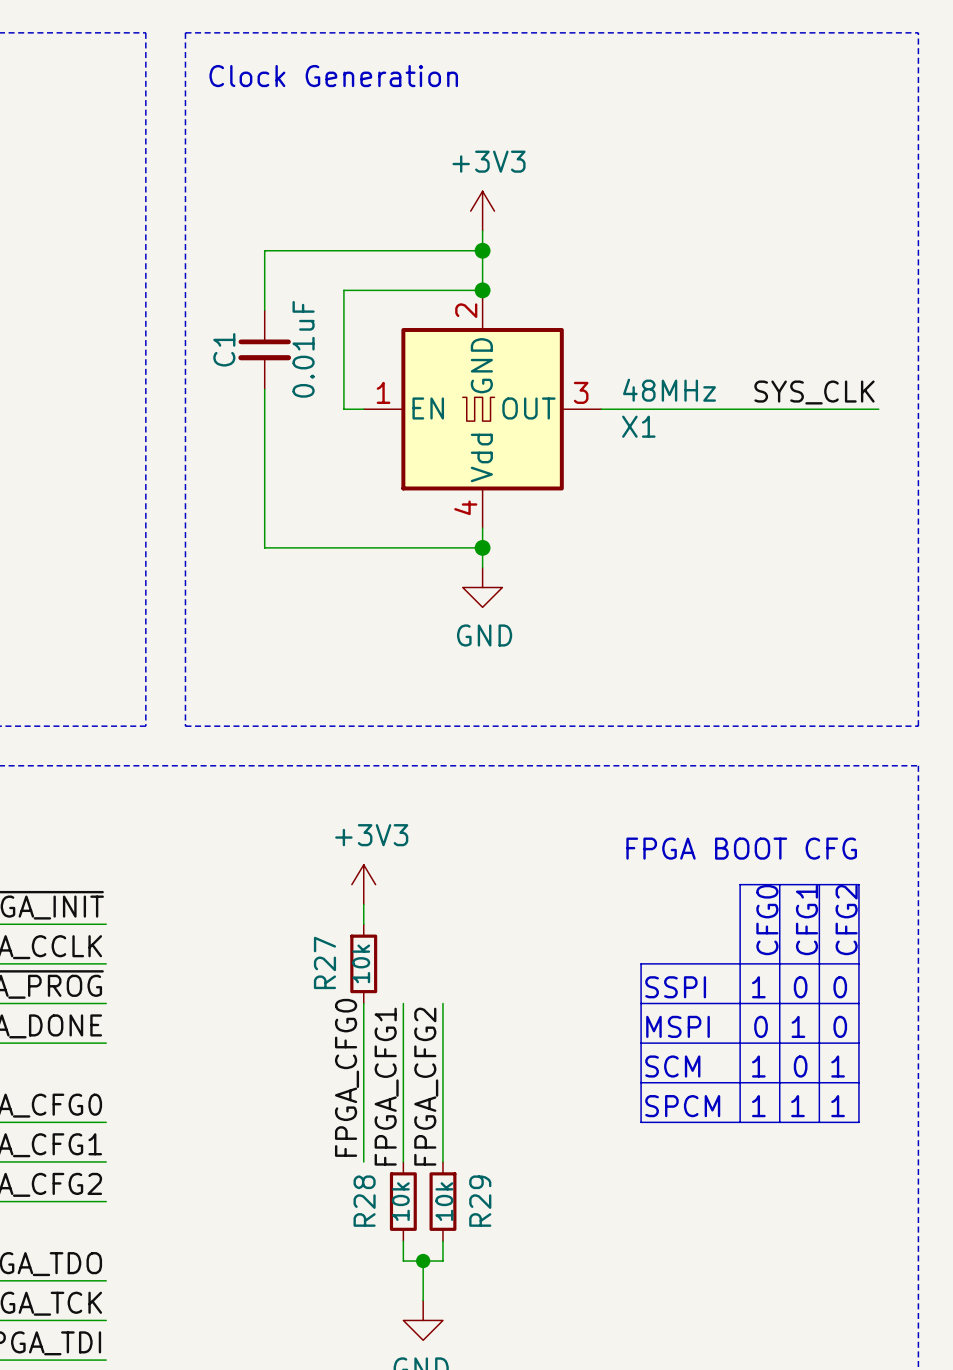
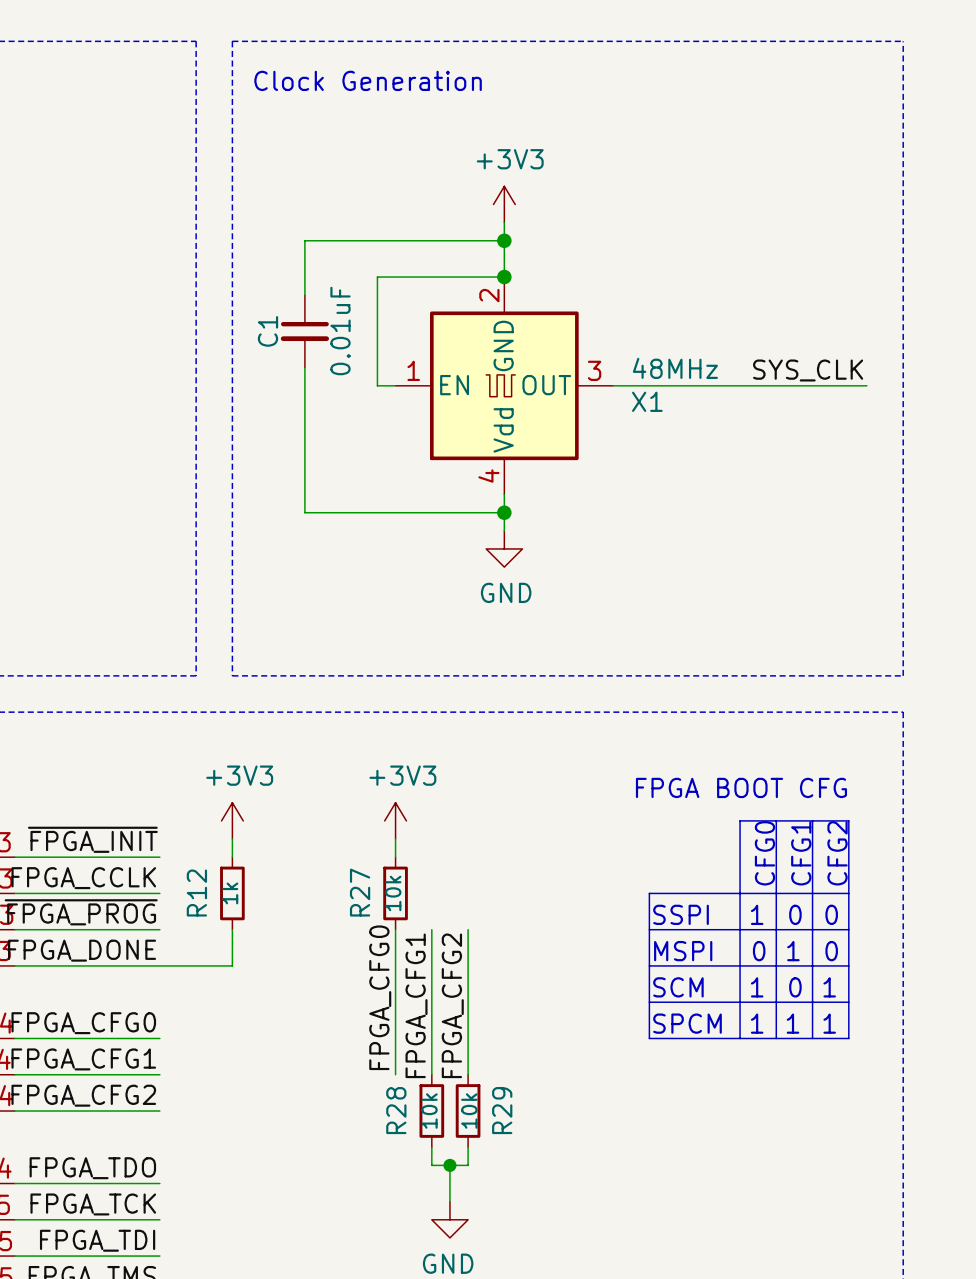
power symbol: none -> +3V3 (232, 820)
wire: none -> (232, 839) (232, 857)
R12: none -> 1k (232, 893)
wire: none -> (232, 929) (232, 965) (159, 965)

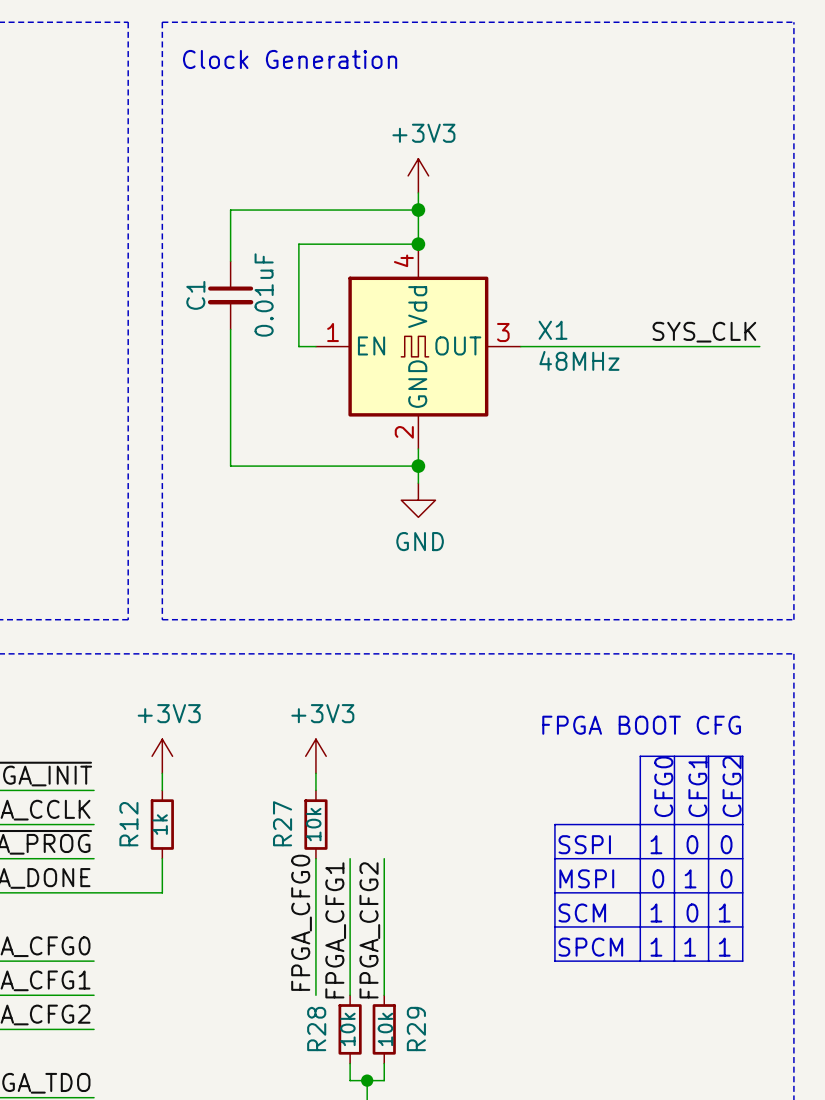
X1 flip: as is (504, 385) -> up-down (418, 346)

